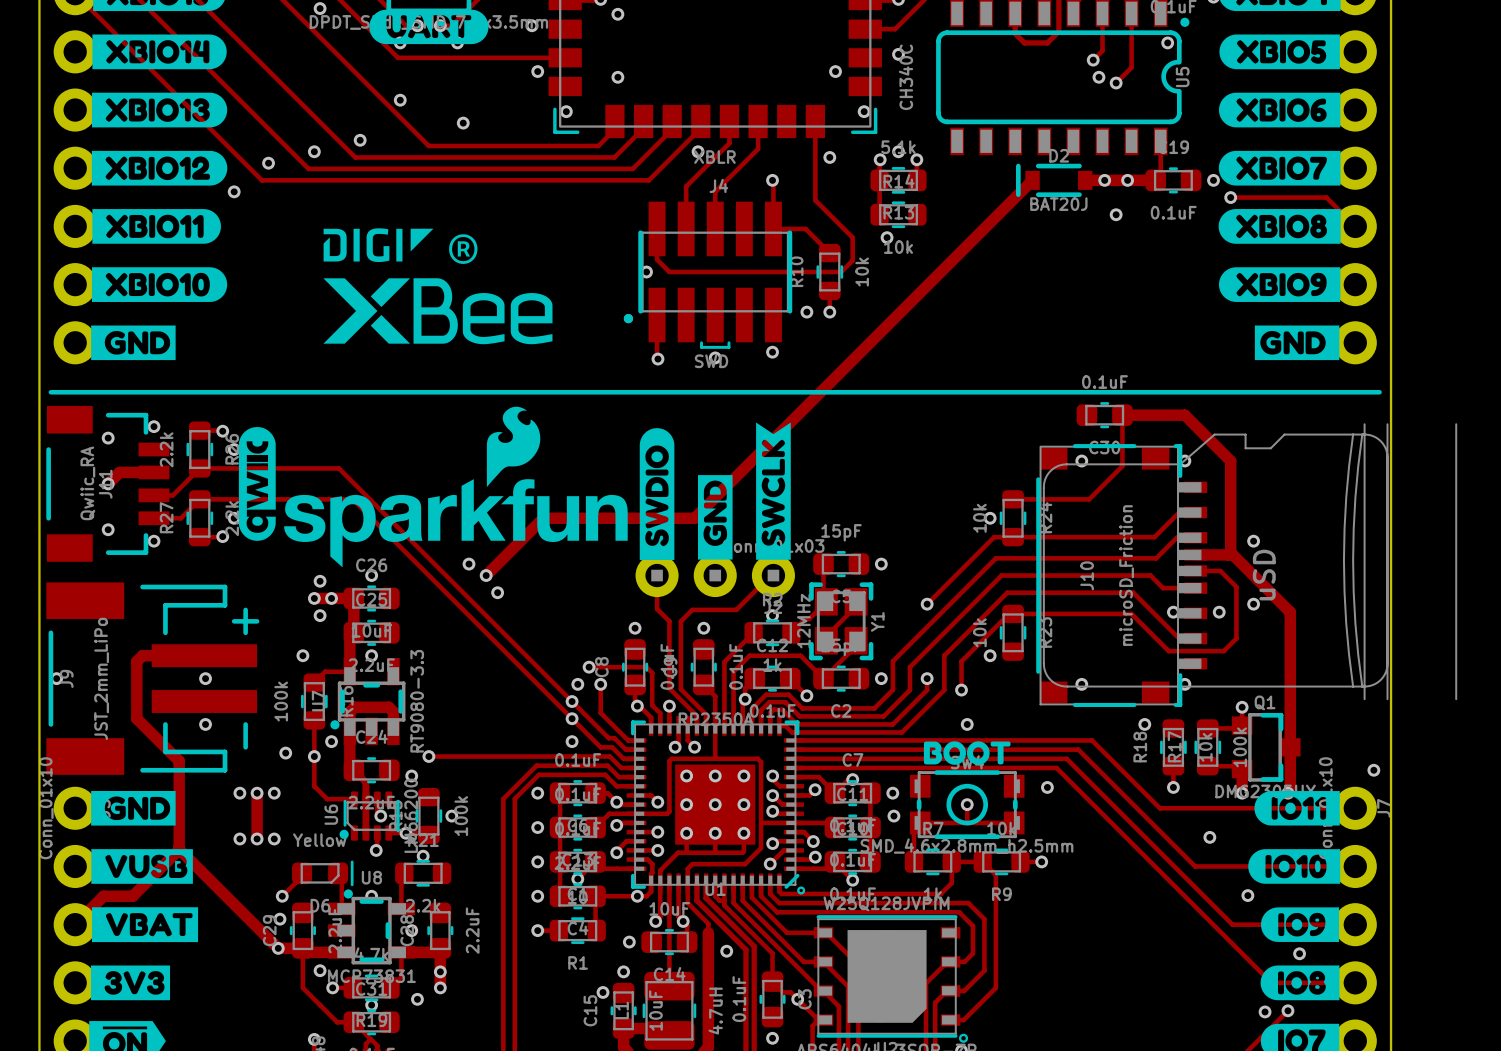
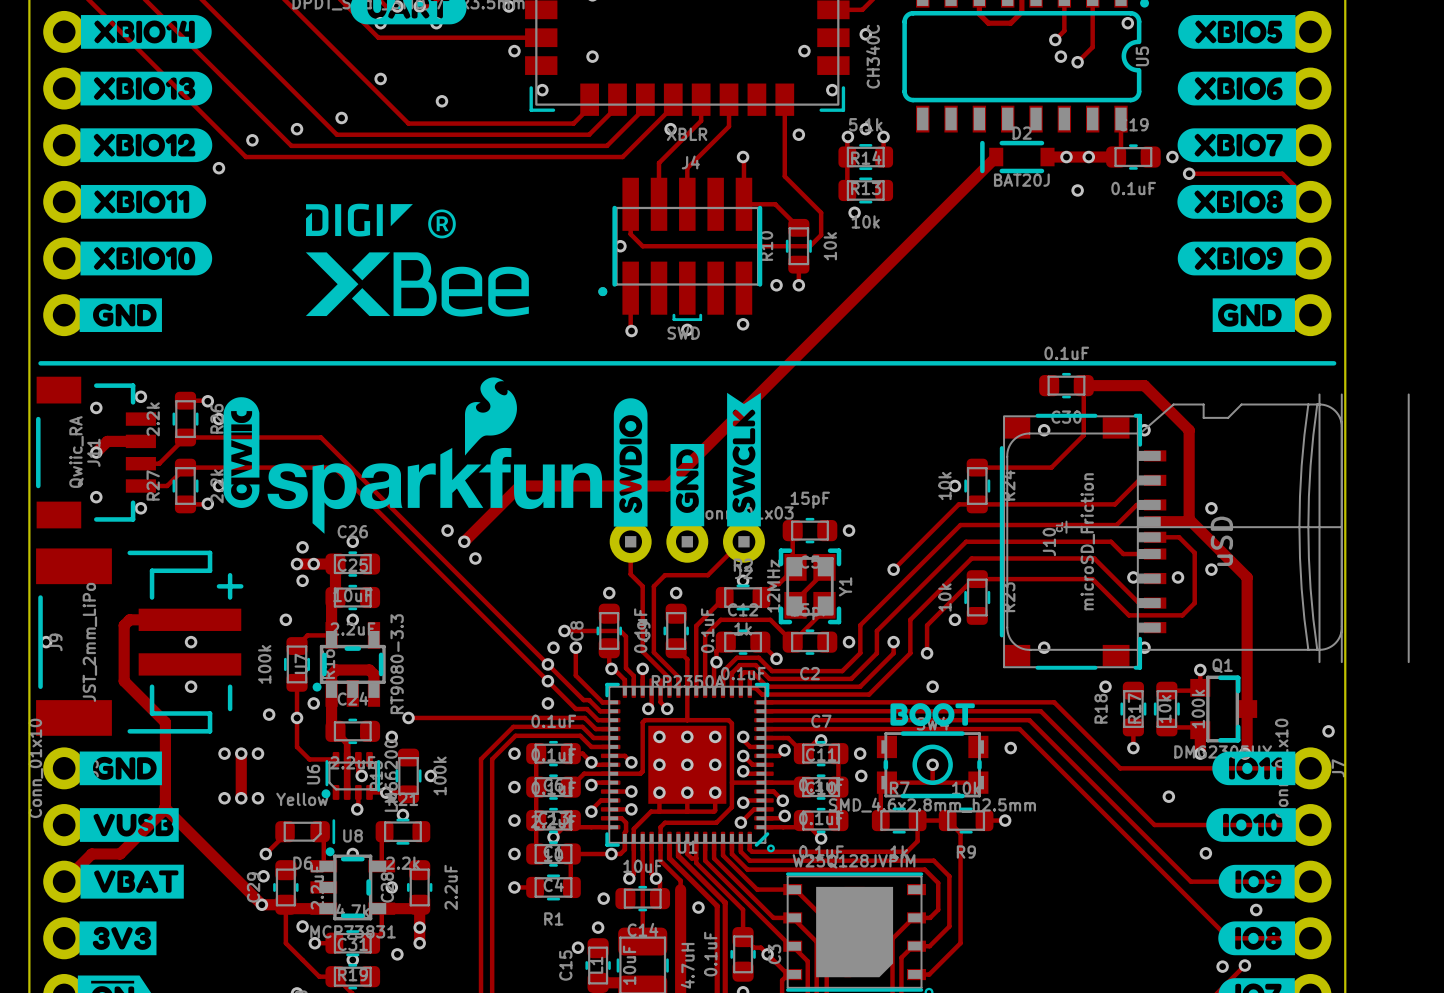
J10 footprint: [1036, 423, 1457, 708] -> [999, 393, 1410, 670]

